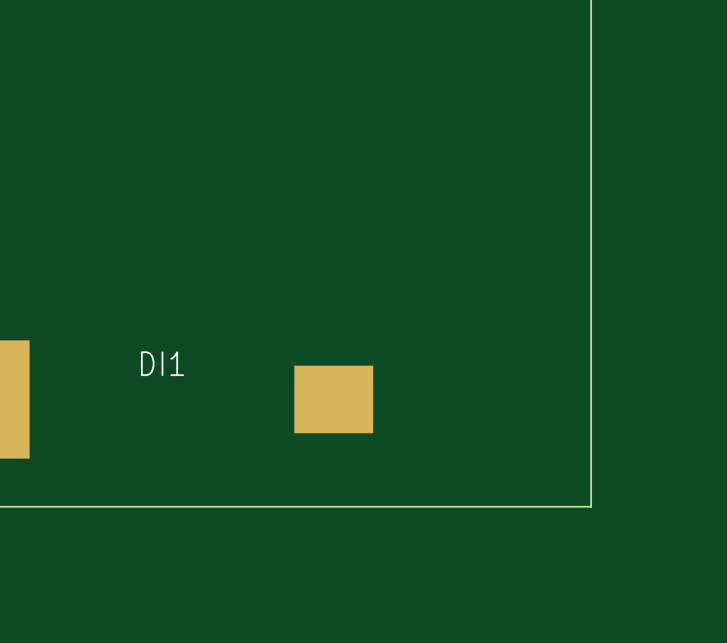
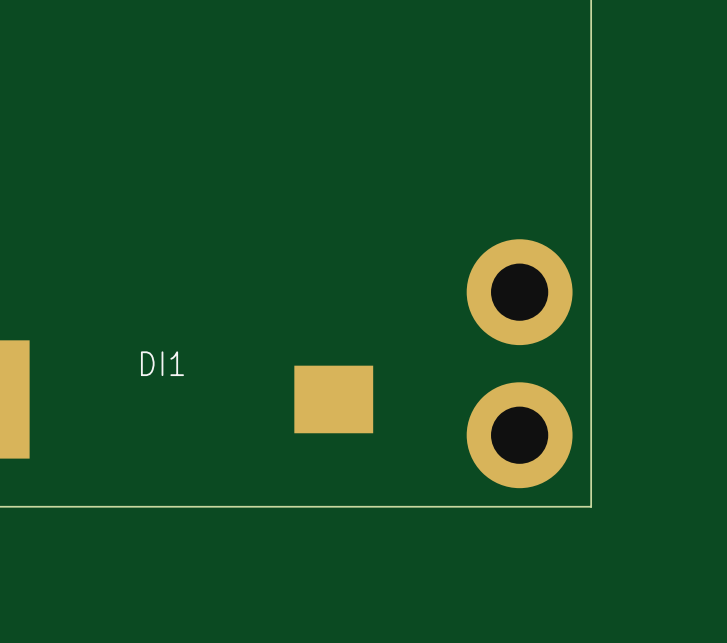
part: none -> (519, 292)
part: none -> (519, 435)

